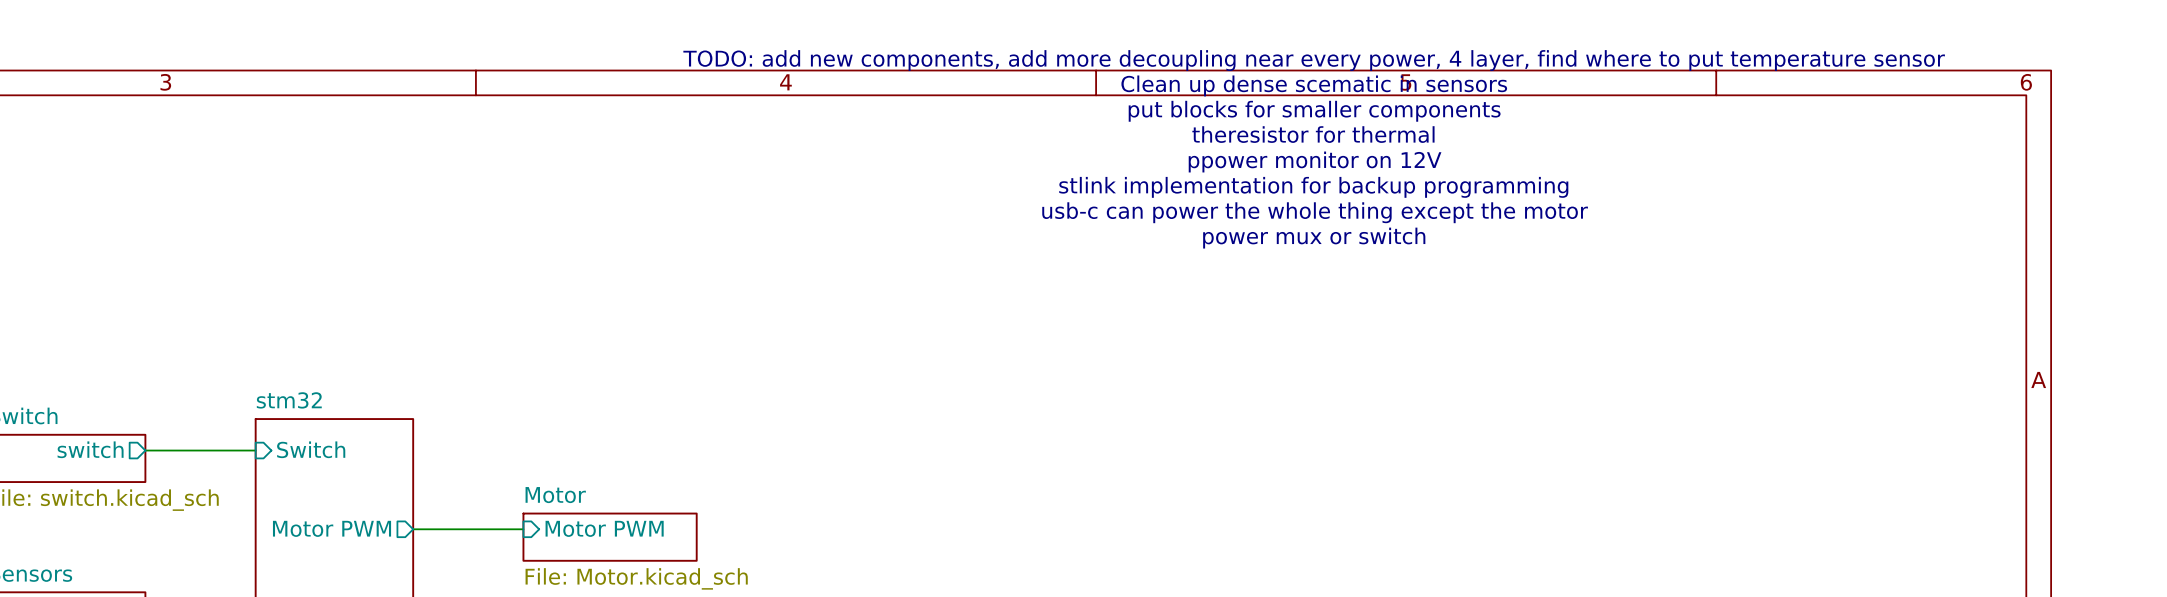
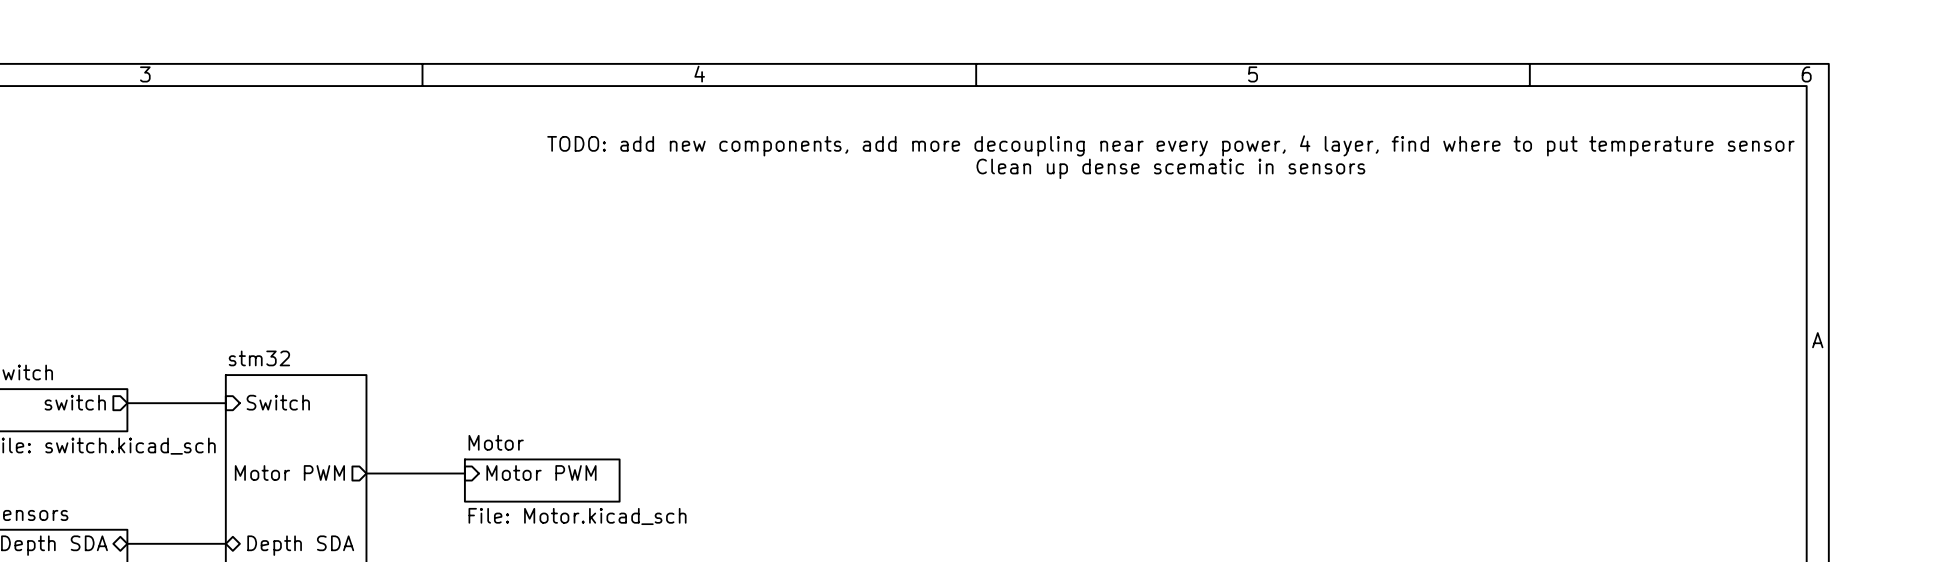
text: TODO: add new components, add more decoupling near every power, 4 layer, find where to put temperature sensor (1314, 60) -> none
text: Clean up dense scematic in sensors (1314, 85) -> none
text: put blocks for smaller components (1314, 111) -> none
text: theresistor for thermal (1313, 134) -> none
text: ppower monitor on 12V (1315, 162) -> TODO: add new components, add more decoupling near every power, 4 layer, find where to put temperature sensor (1170, 145)
text: stlink implementation for backup programming (1313, 187) -> Clean up dense scematic in sensors (1170, 168)
text: usb-c can power the whole thing except the motor (1315, 212) -> none
text: power mux or switch (1314, 238) -> none

